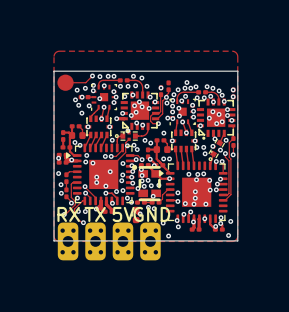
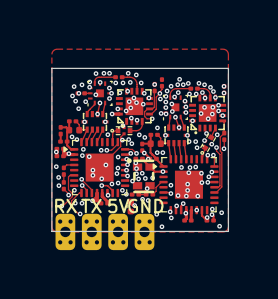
track: (92, 75) (85, 82) (65, 82) -> none
via: (92, 75) -> none
part: (65, 82) -> none
via: none -> (212, 107)
via: (219, 114) -> none
via: none -> (212, 114)
via: (222, 121) -> none

